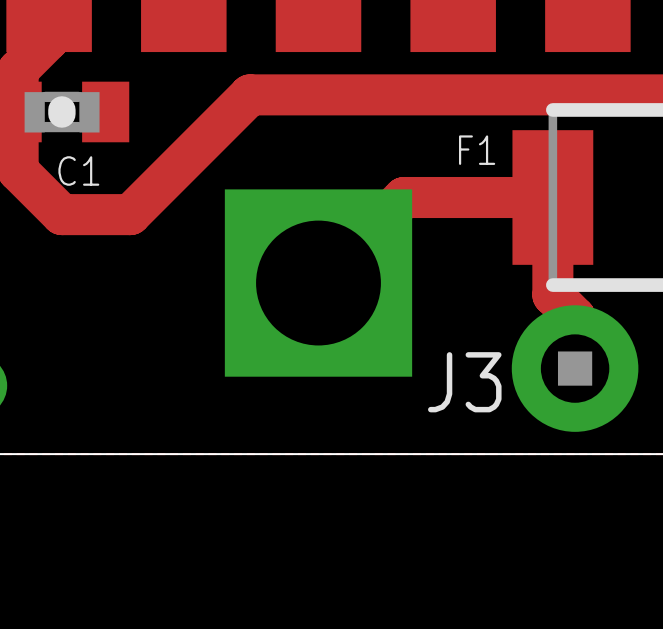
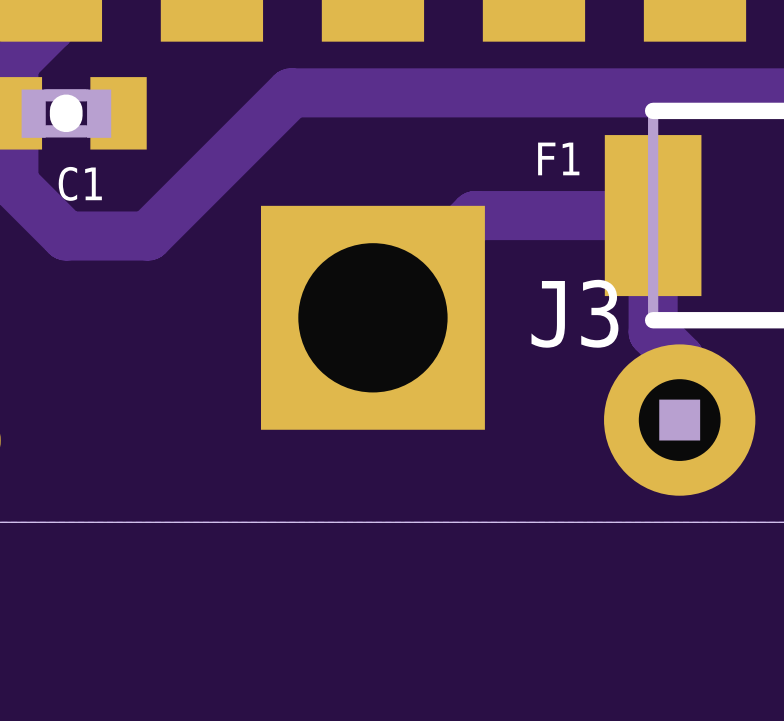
J3 name position: J3 (464, 382) -> J3 (574, 313)

